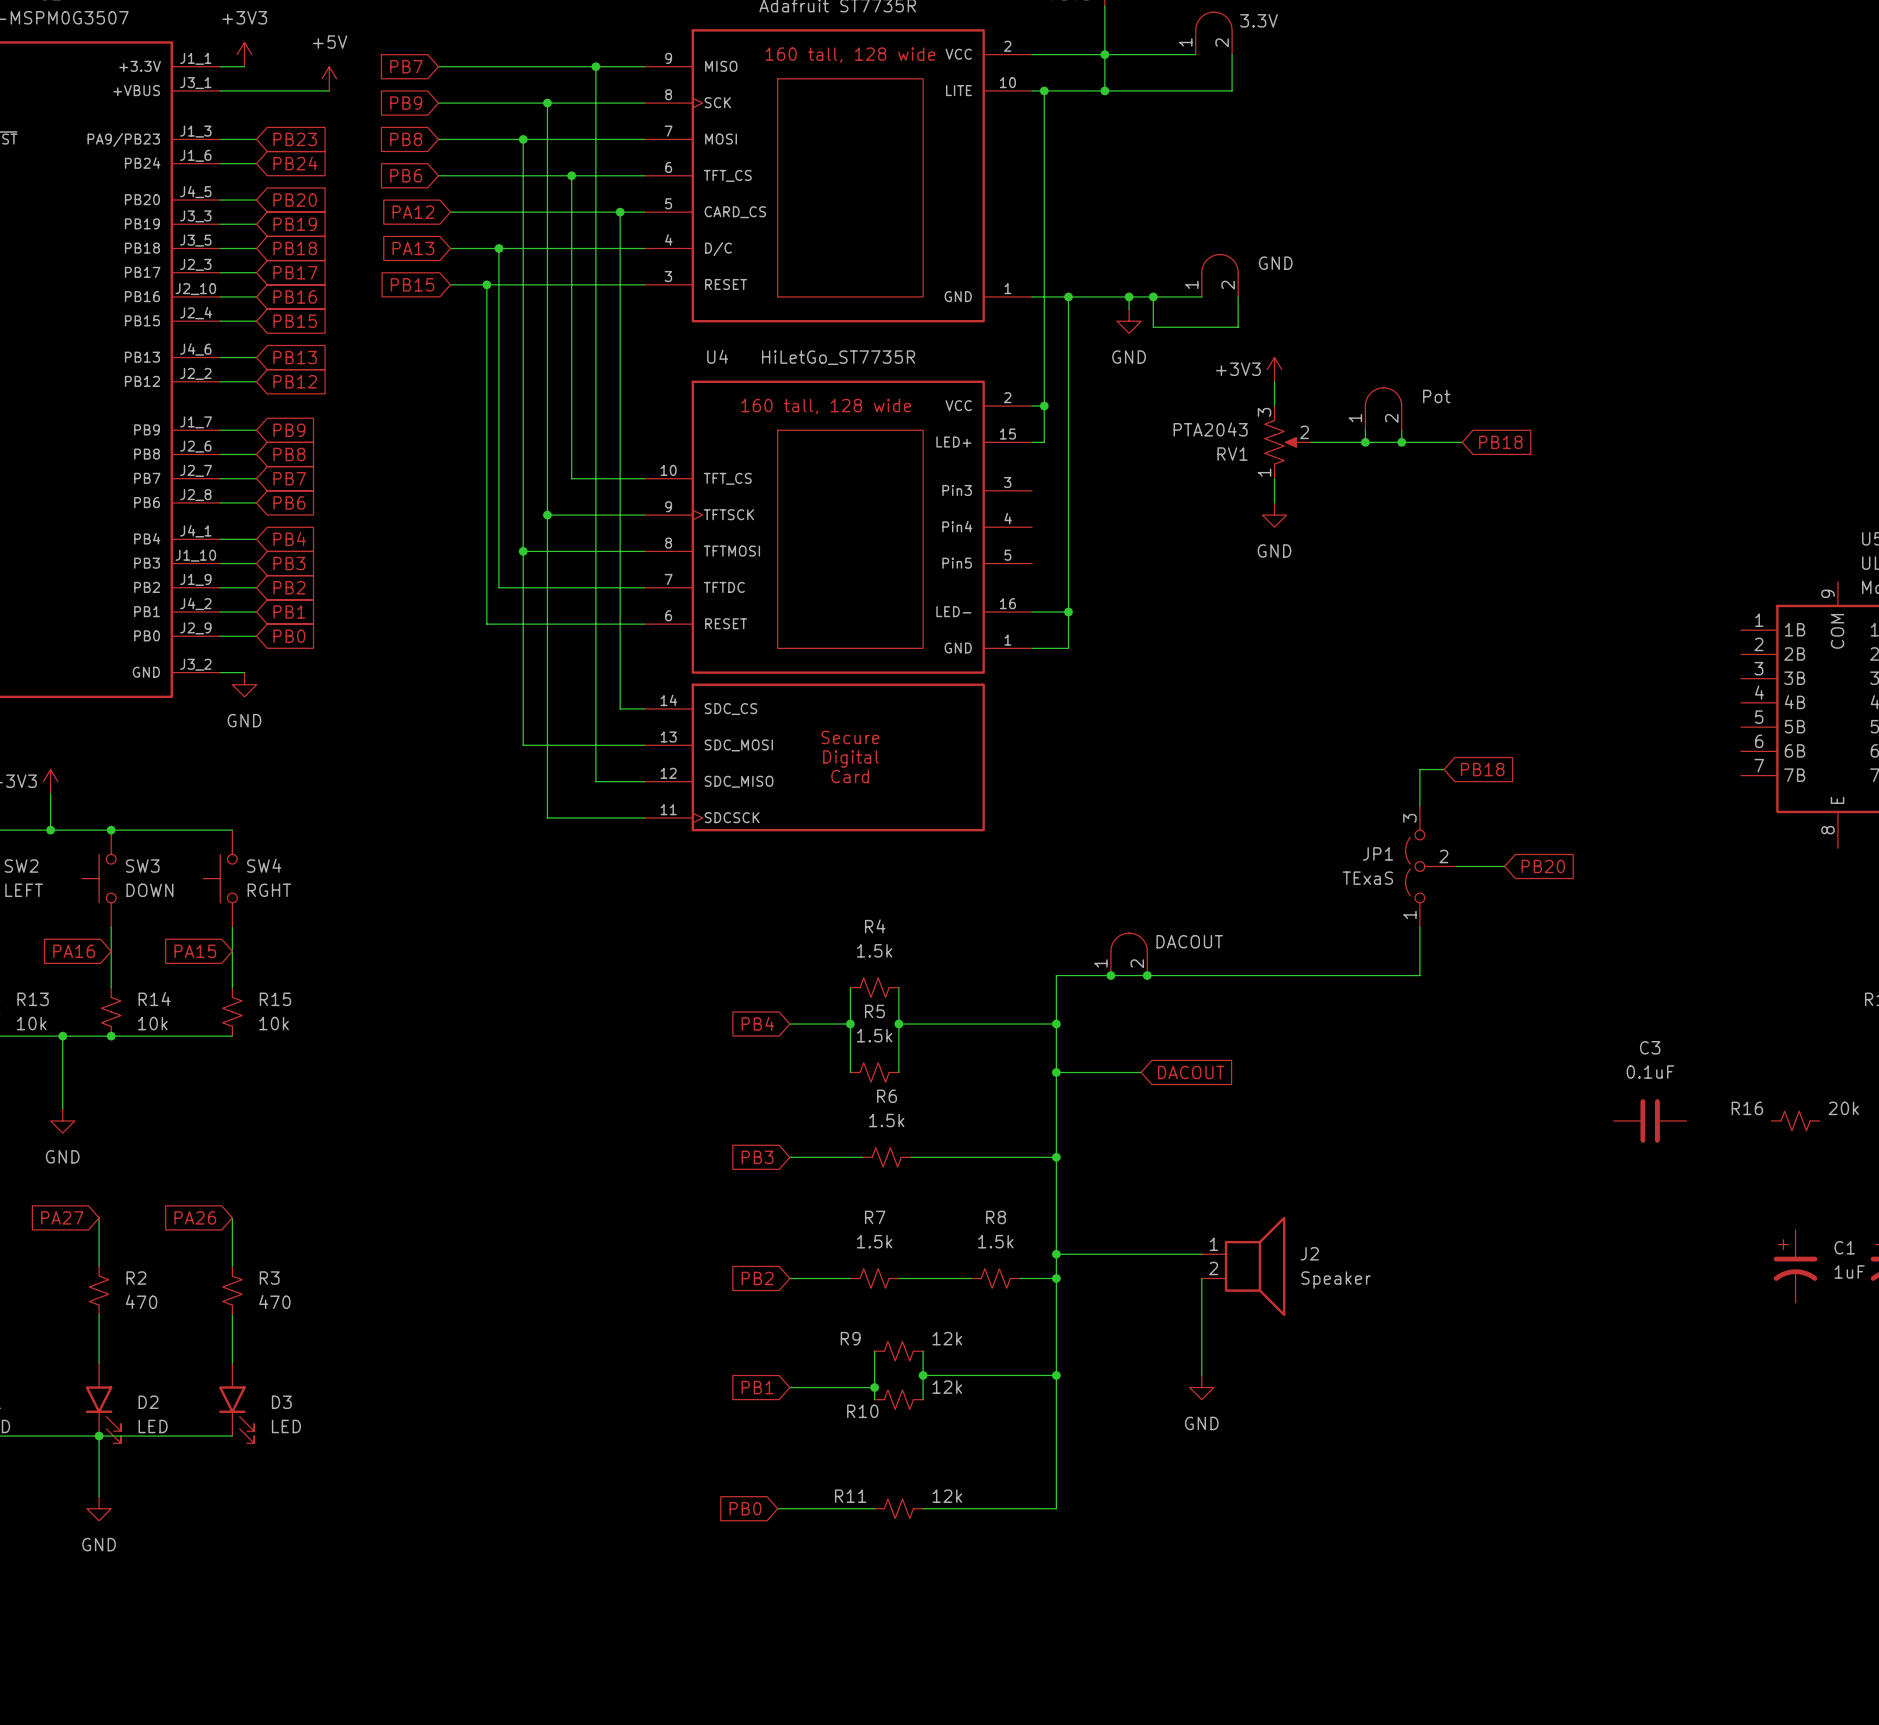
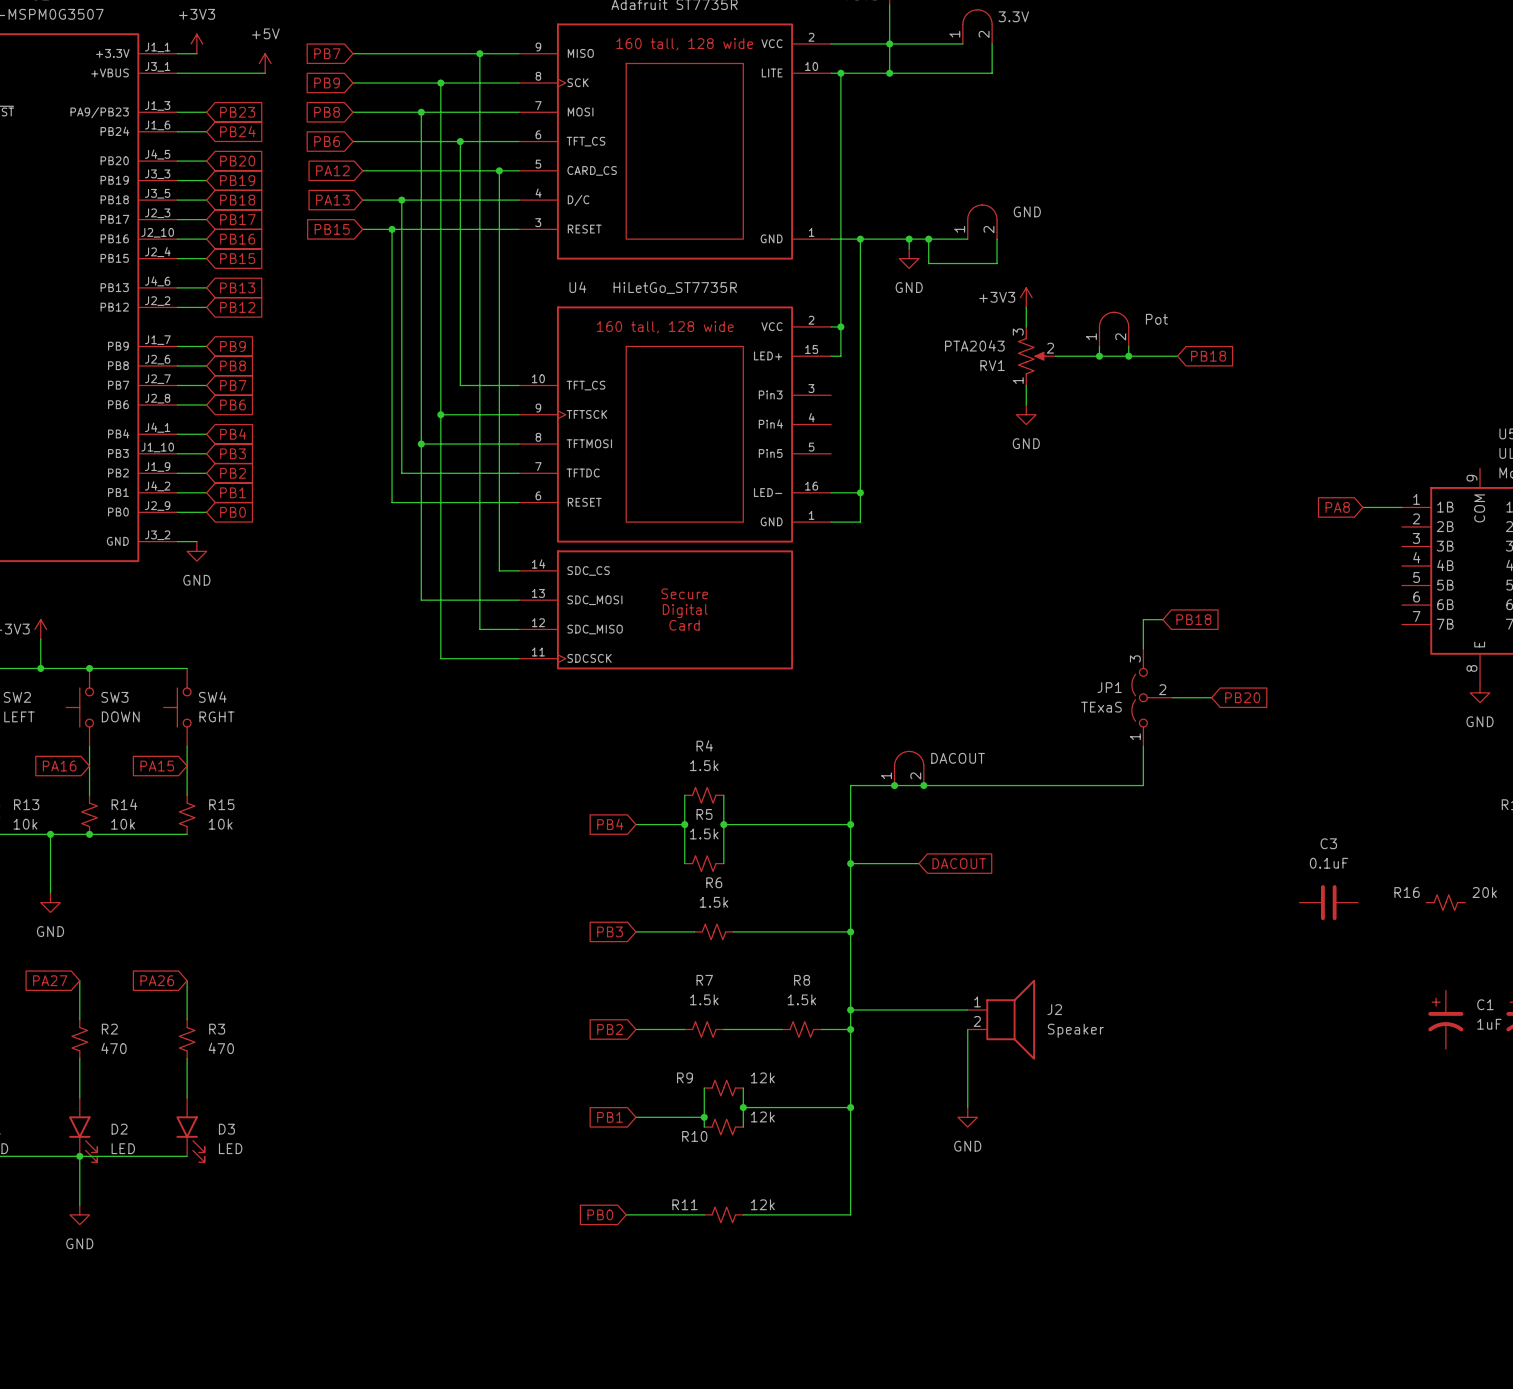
global label: none -> PA8 (1337, 507)
wire: none -> (1362, 507) (1401, 507)
power symbol: none -> GND (1480, 692)

